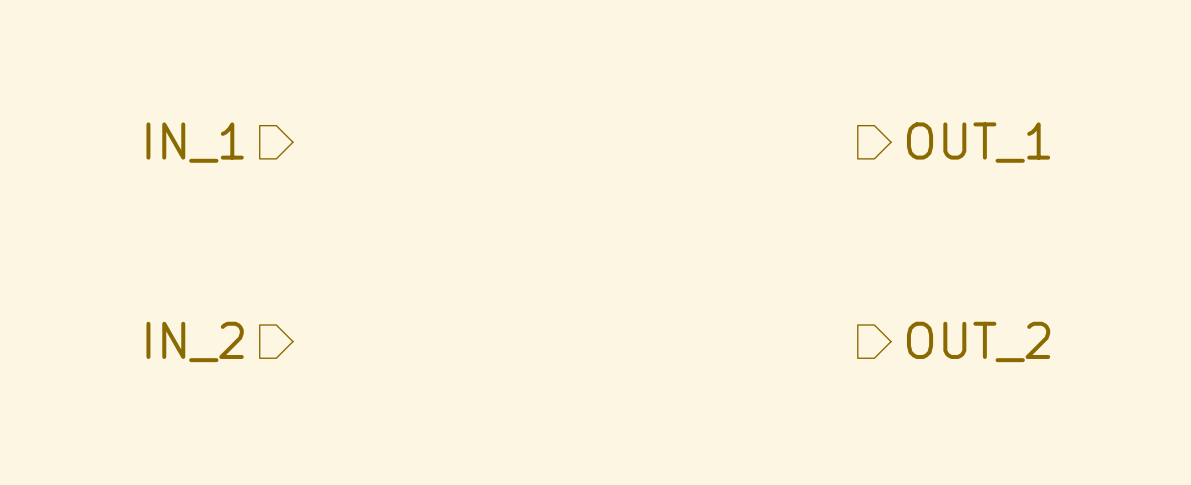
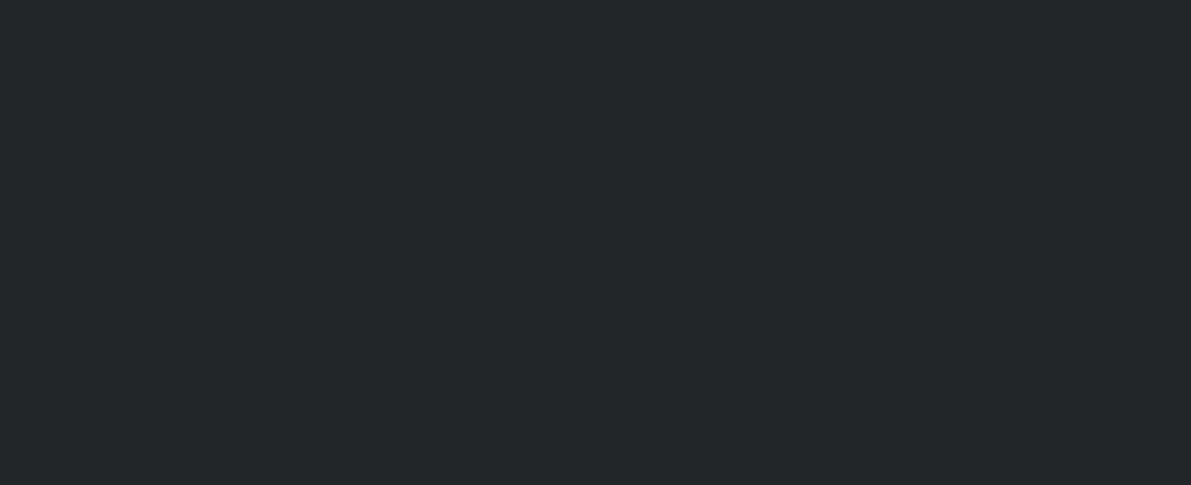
hierarchical label: IN_1 (195, 142) -> none
hierarchical label: OUT_1 (978, 142) -> none
hierarchical label: IN_2 (195, 341) -> none
hierarchical label: OUT_2 (978, 341) -> none

